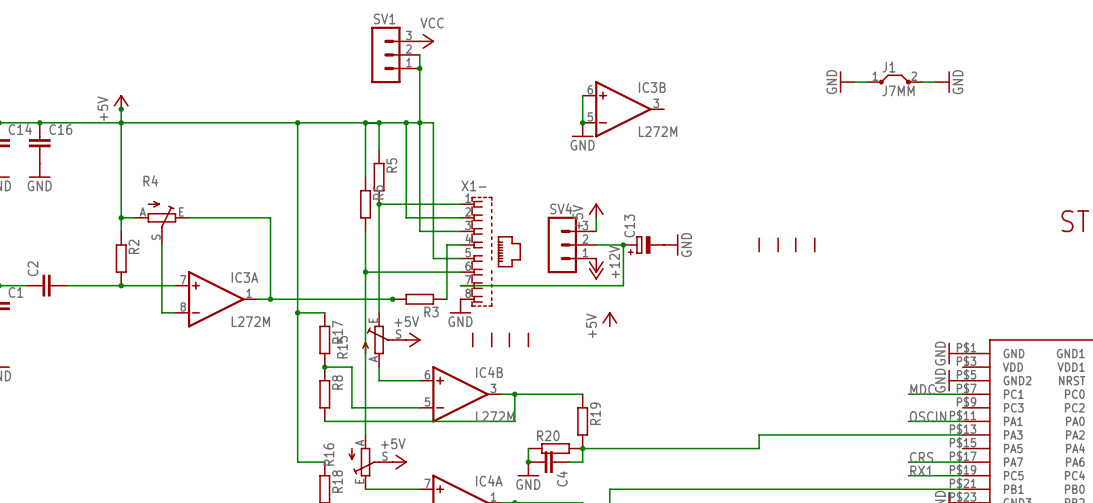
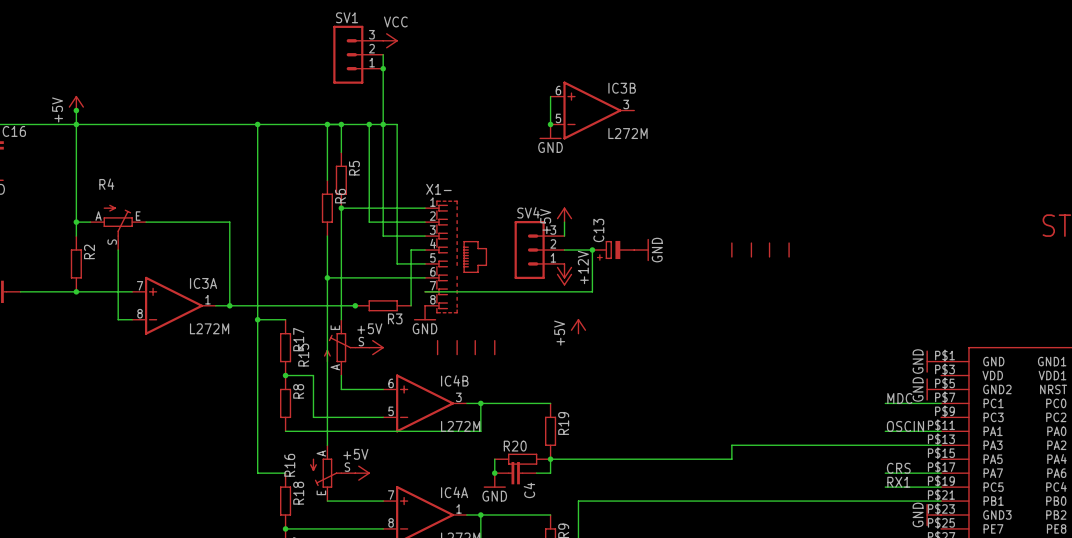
J1: J7MM (894, 79) -> none
power symbol: GND (847, 82) -> none
wire: (854, 82) (867, 82) -> none
wire: (921, 82) (935, 82) -> none
power symbol: GND (942, 82) -> none

